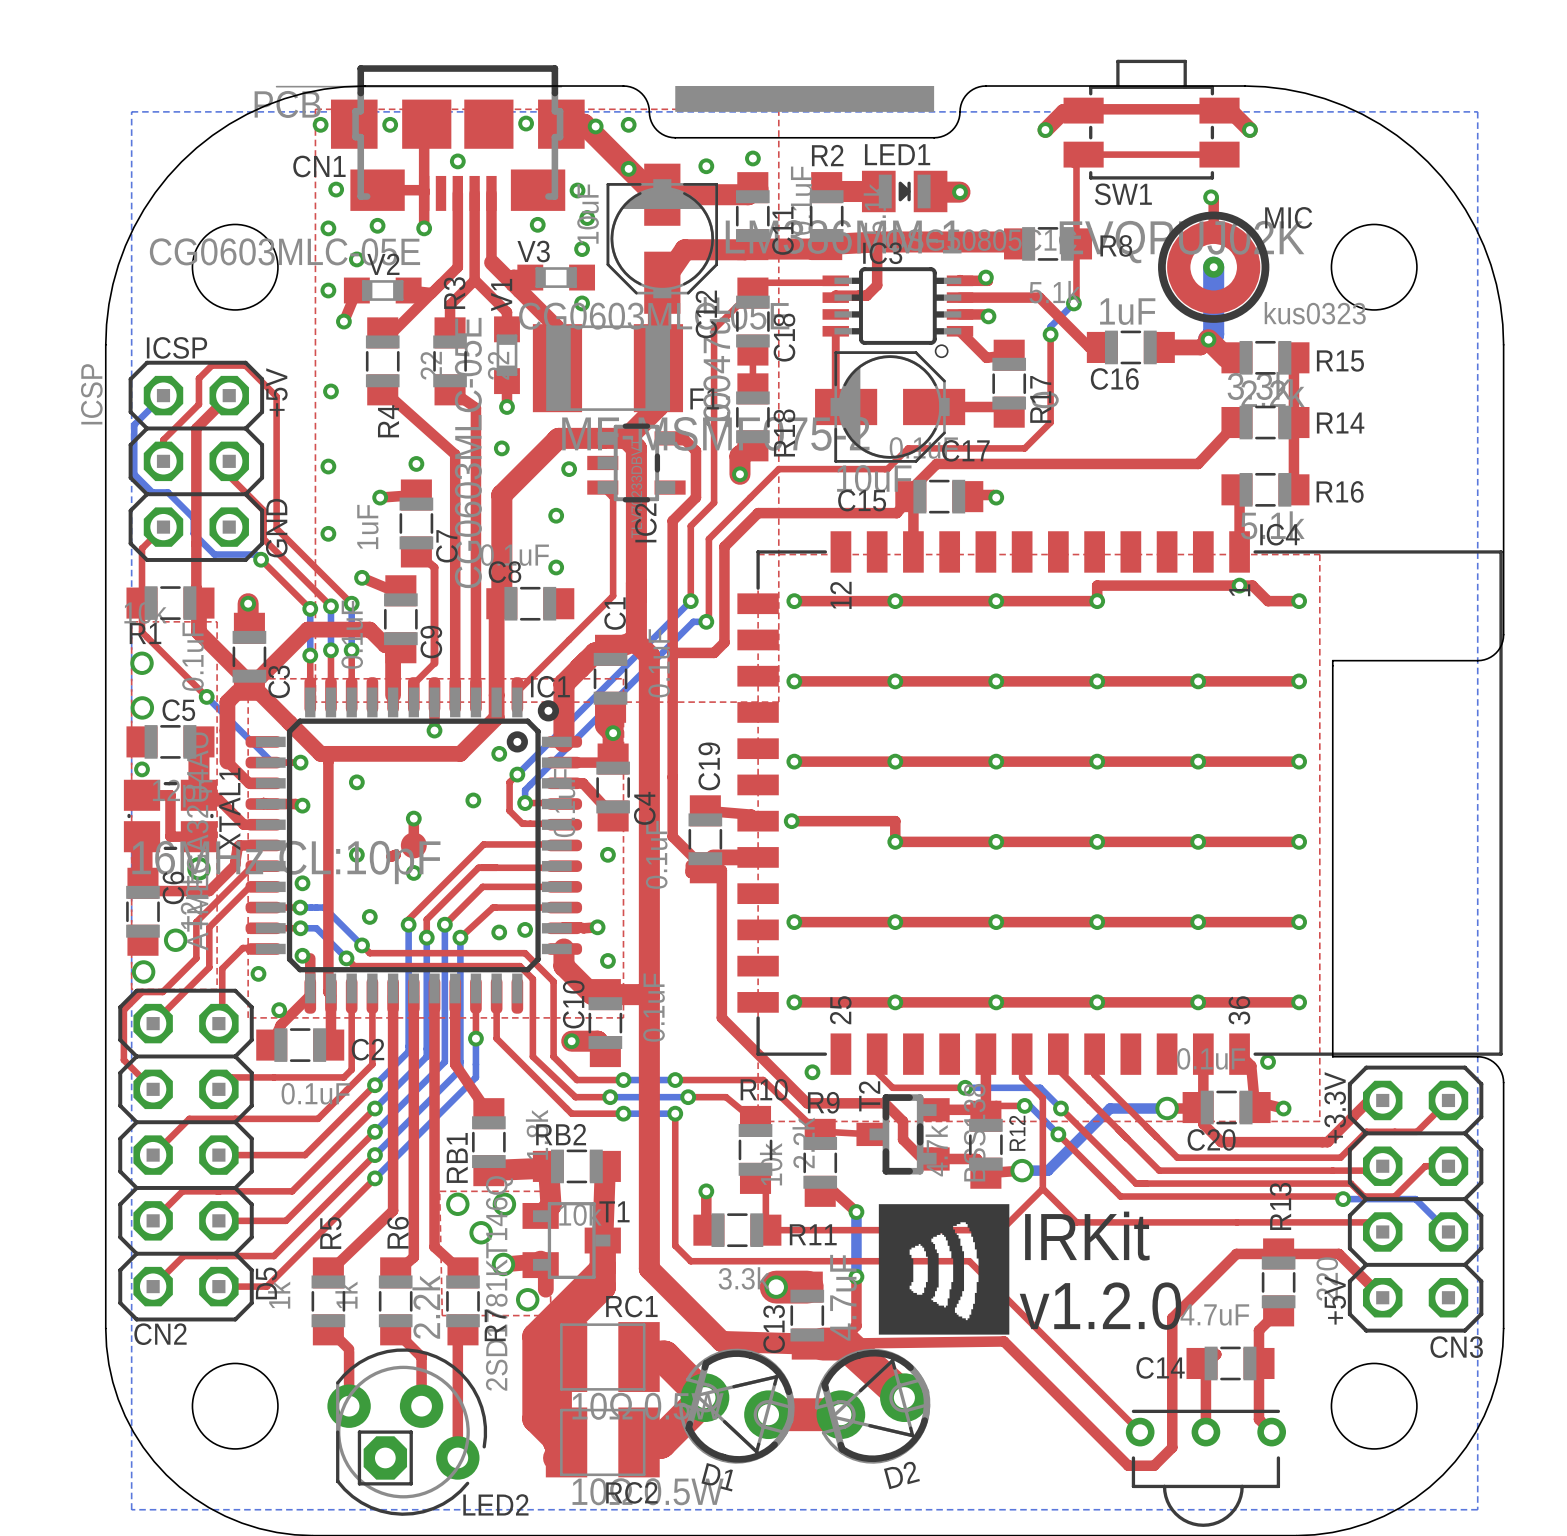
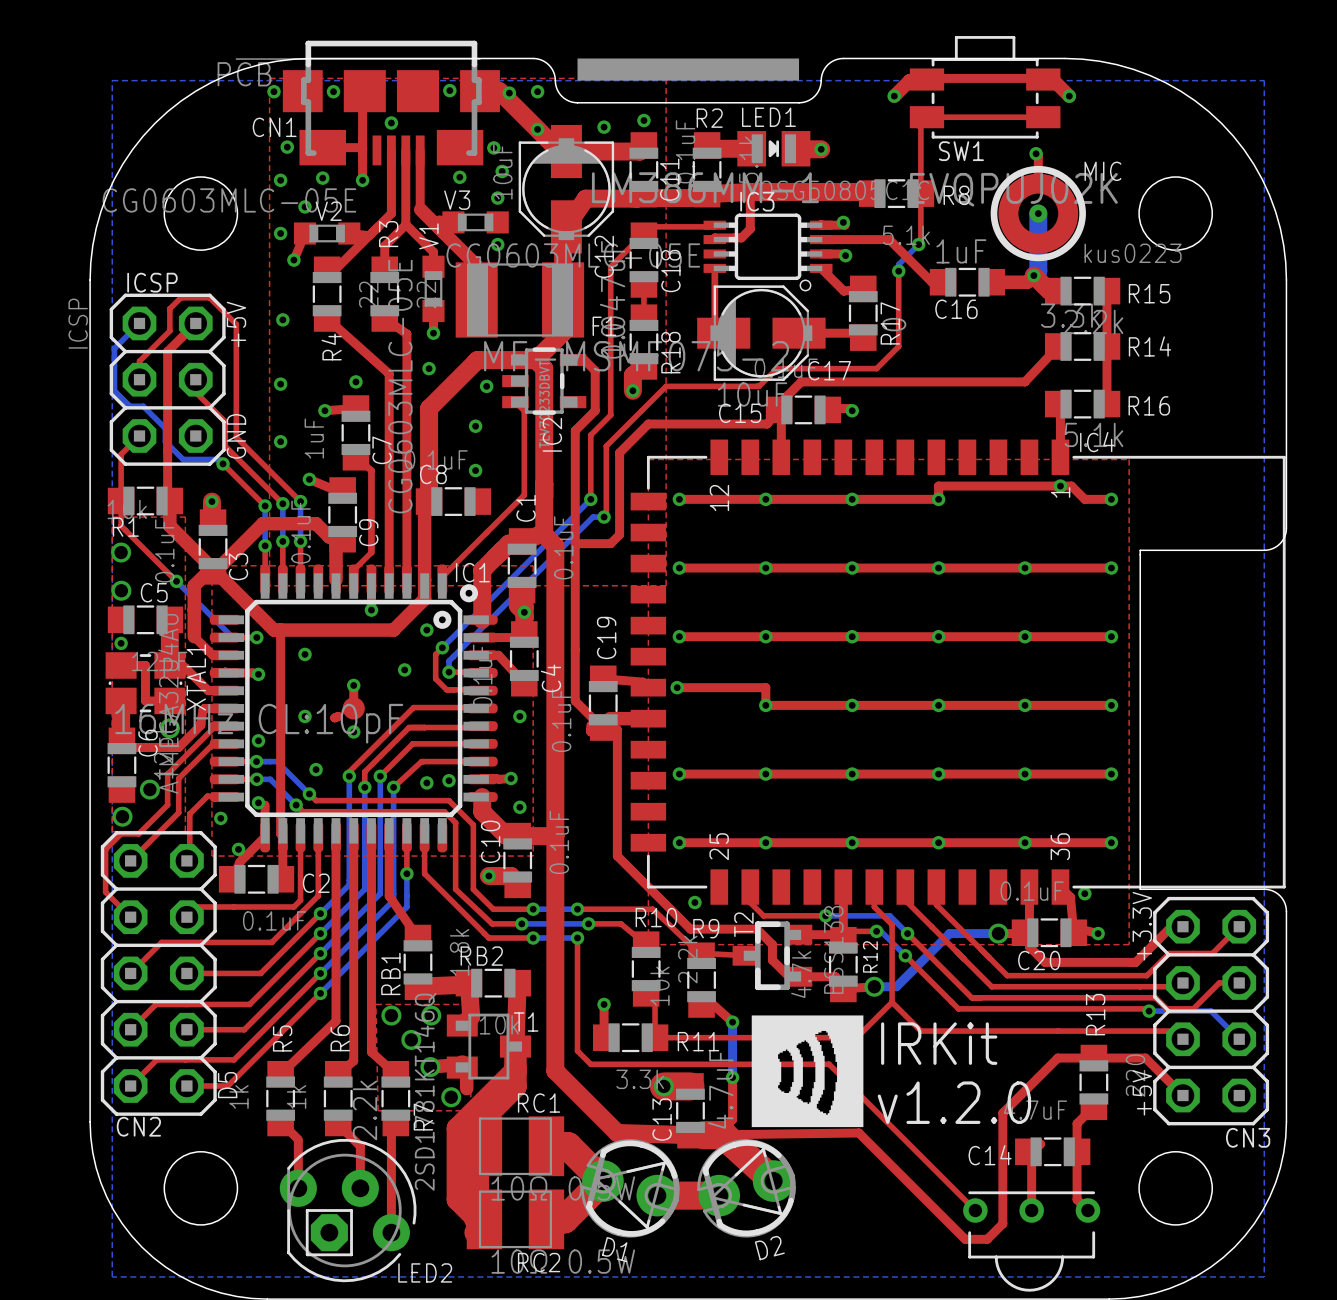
MIC value: kus0323 (1315, 313) -> kus0223 (1133, 253)

